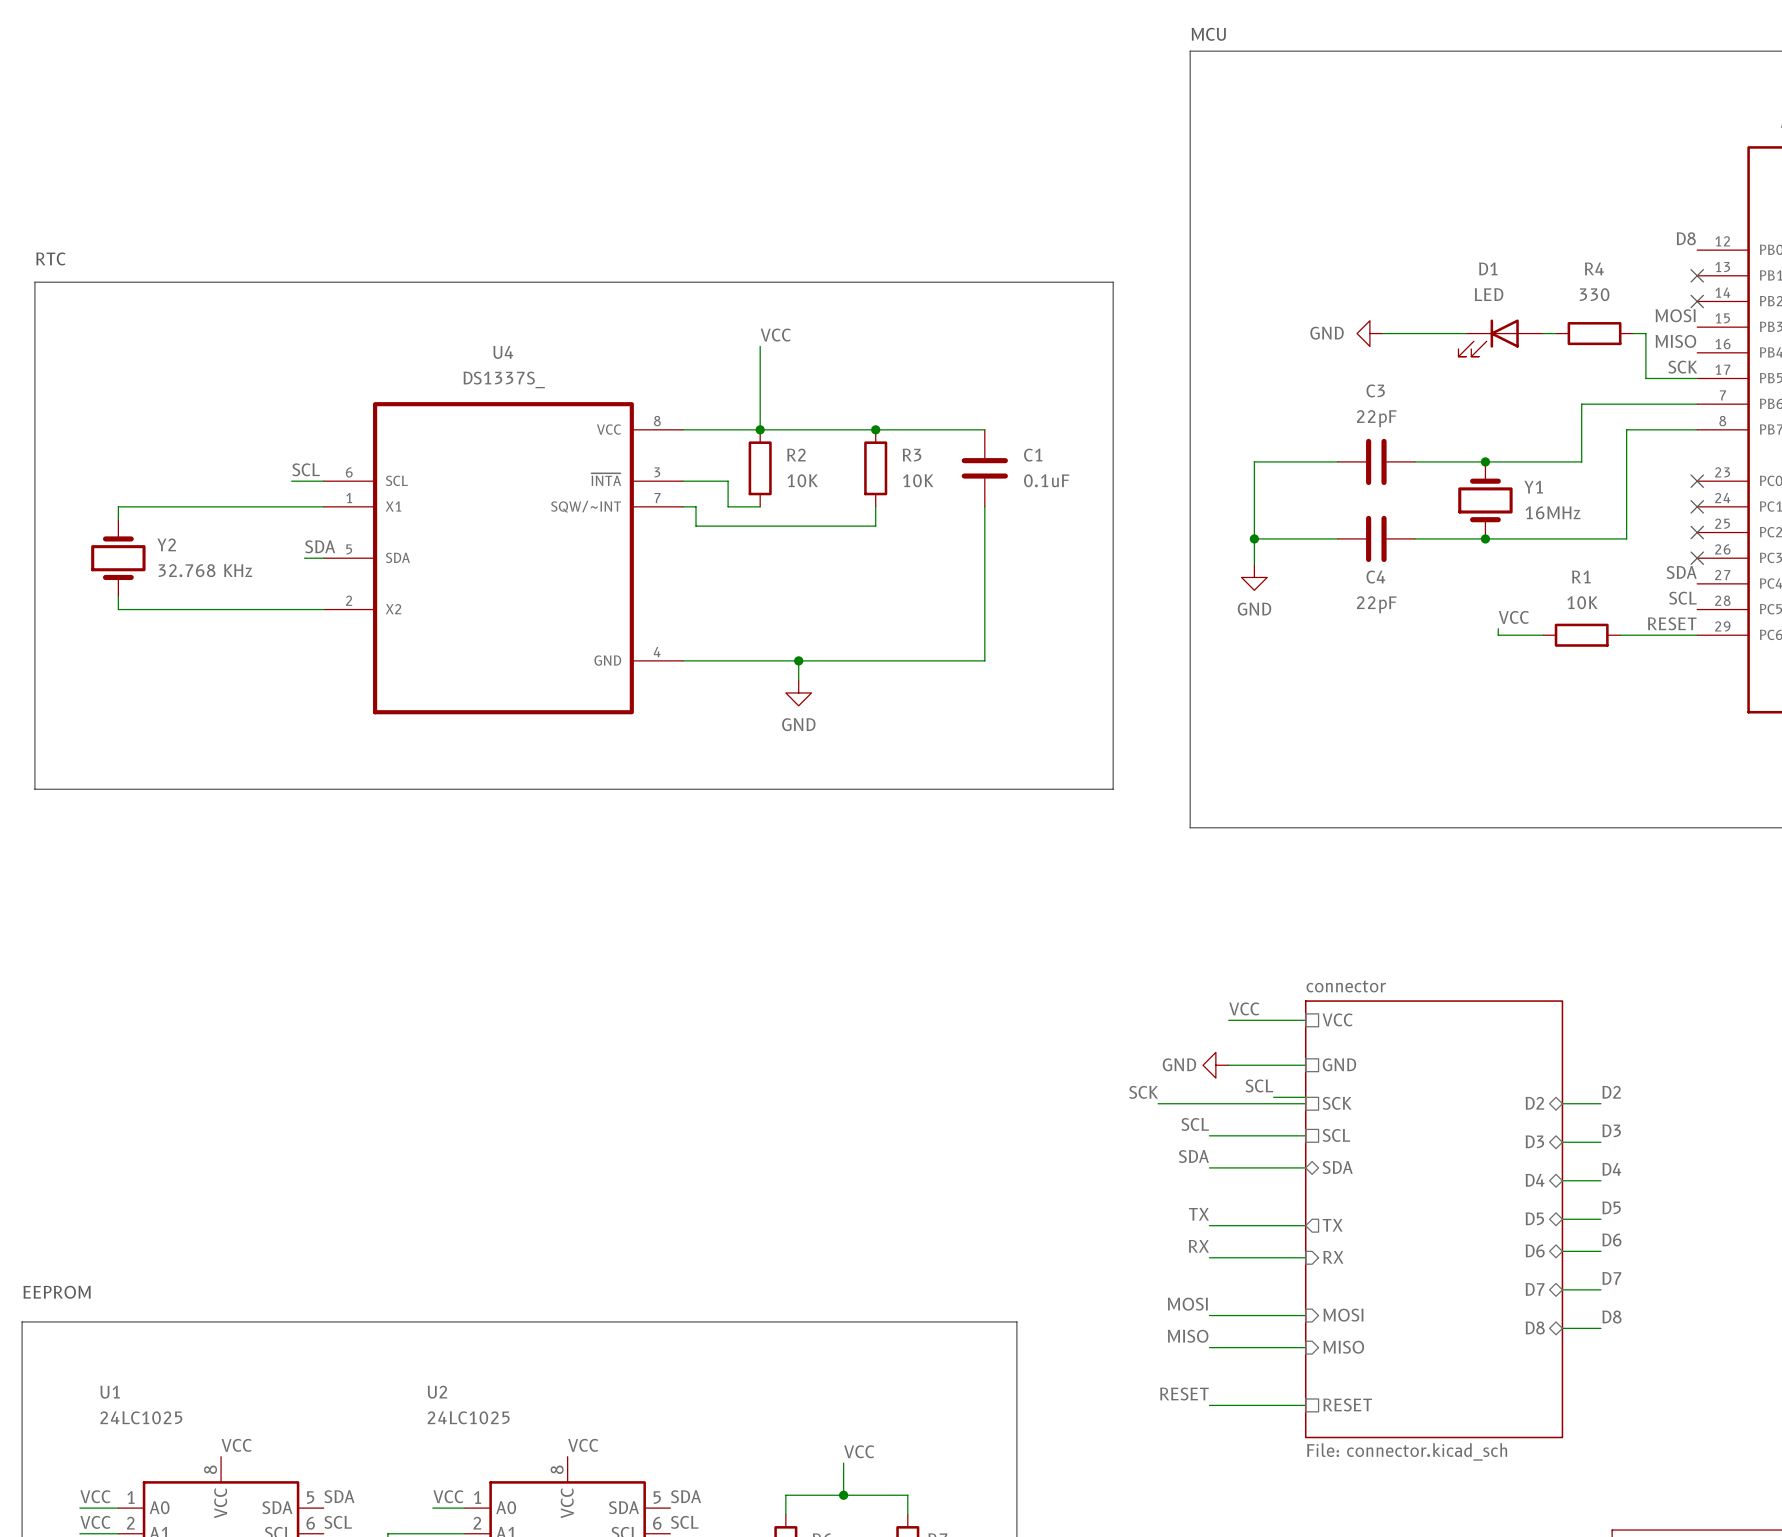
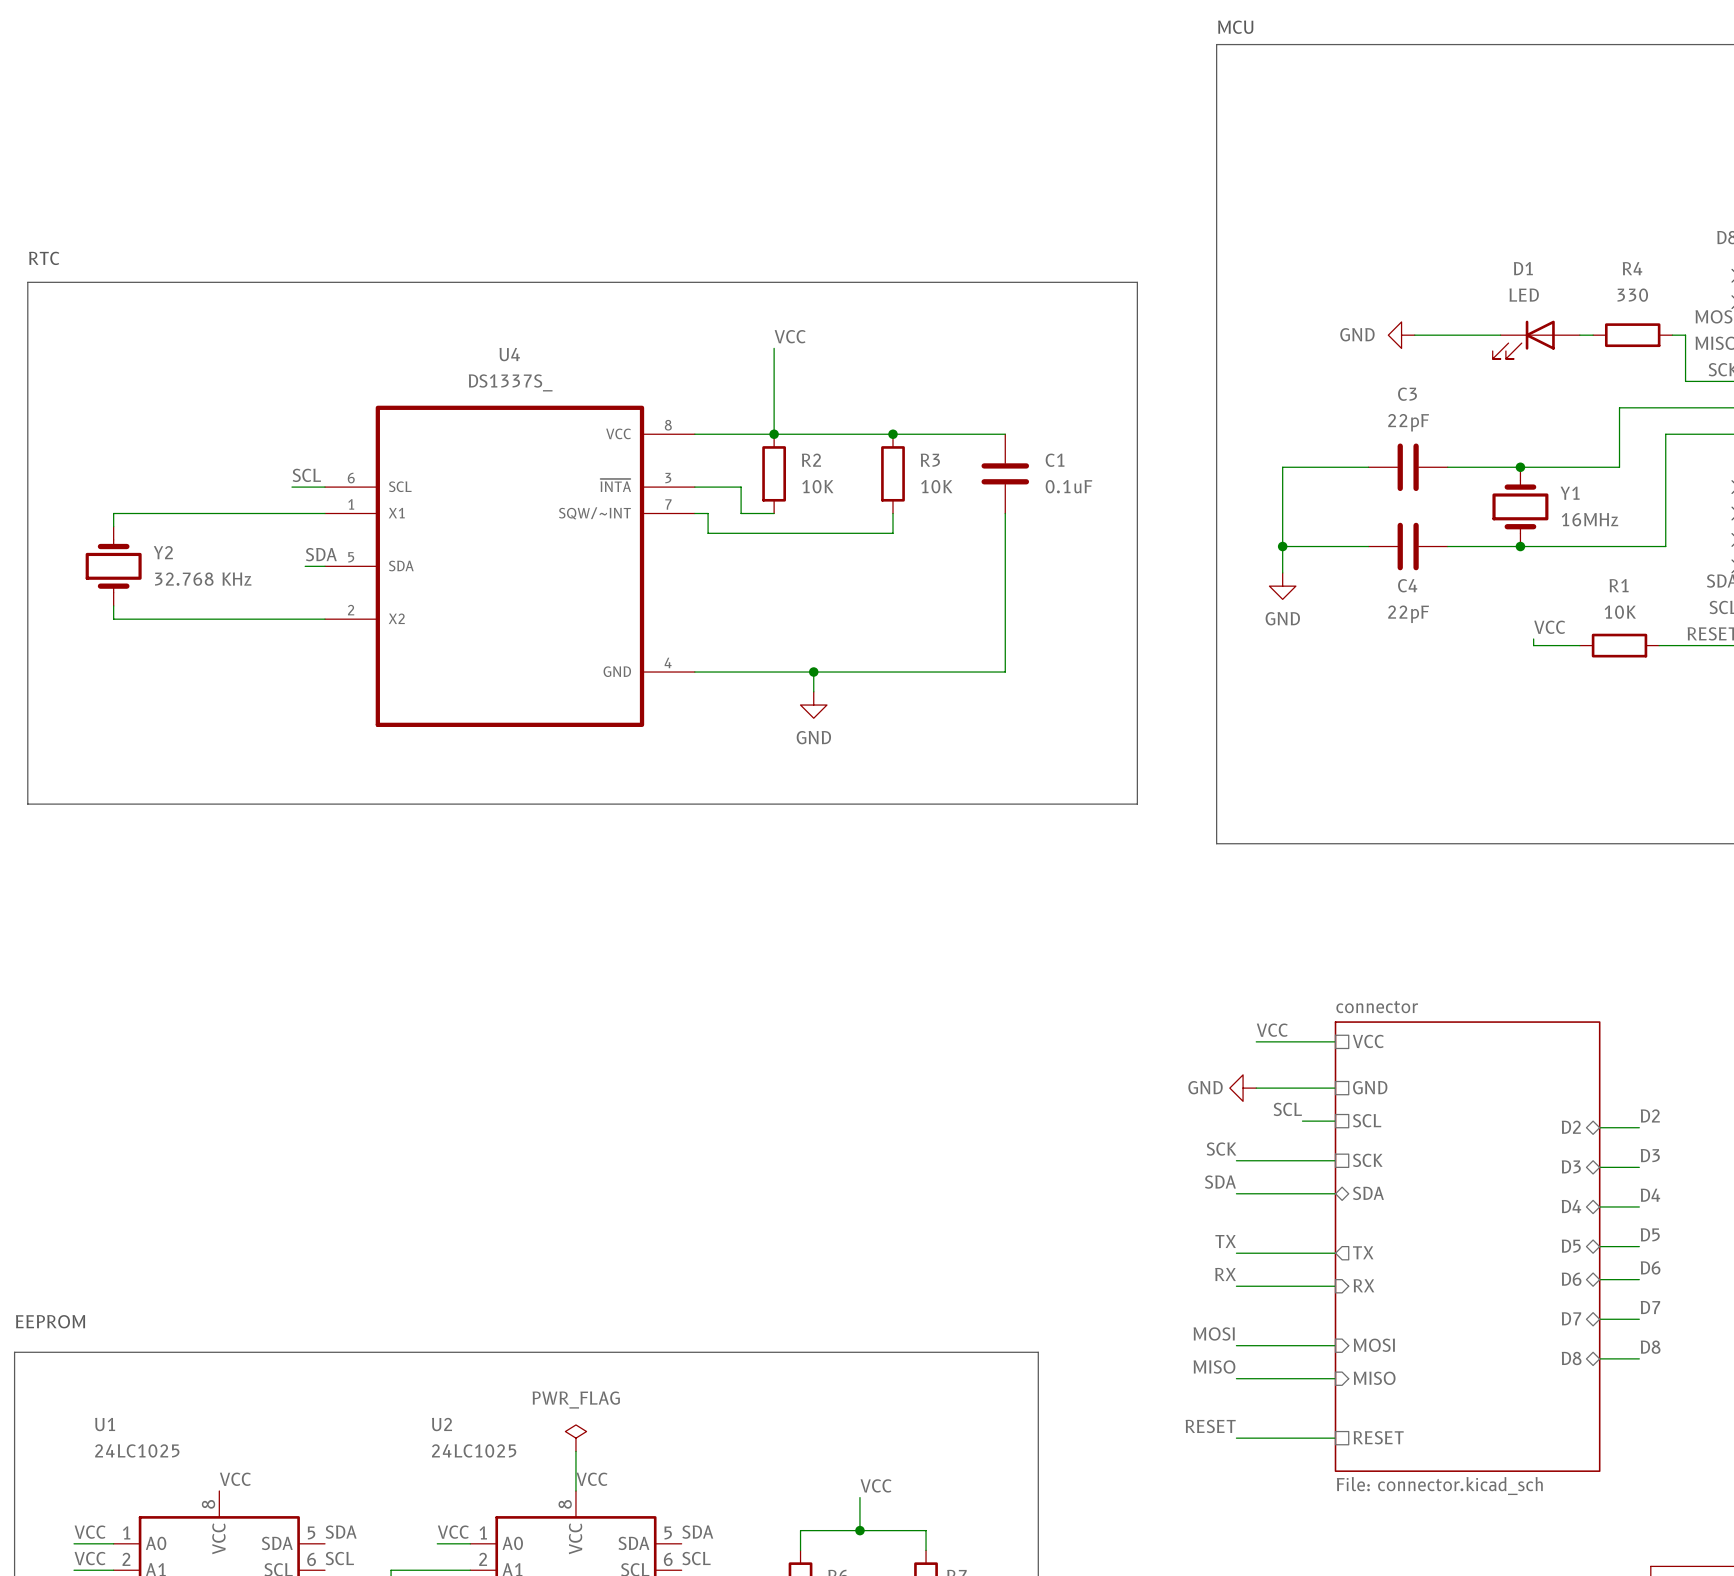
label: SCK (1143, 1092) -> none
wire: (1158, 1103) (1305, 1103) -> none
sheet pin: SCK (1337, 1103) -> SCL (1367, 1120)
label: SCL (1195, 1124) -> SCK (1221, 1149)
sheet pin: SCL (1336, 1135) -> SCK (1367, 1160)
power symbol: none -> PWR_FLAG (575, 1438)
wire: none -> (575, 1451) (575, 1490)

